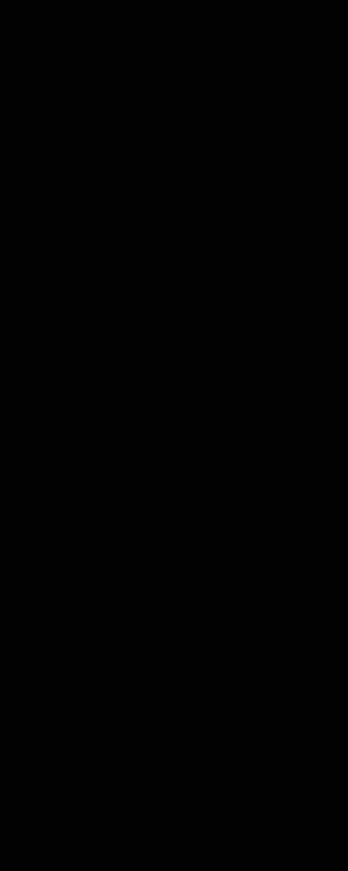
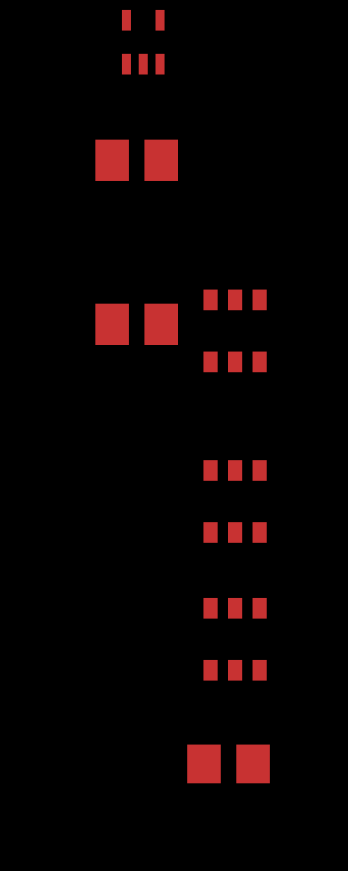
part: none -> (143, 42)
part: none -> (136, 160)
part: none -> (136, 324)
part: none -> (235, 330)
part: none -> (235, 501)
part: none -> (235, 639)
part: none -> (228, 763)

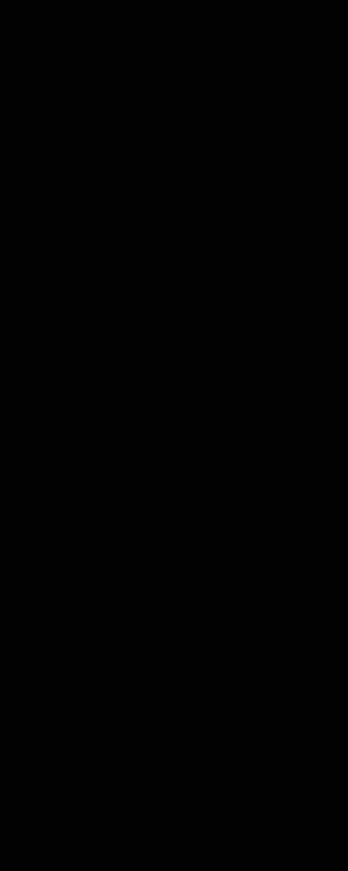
part: (143, 42) -> none
part: (136, 160) -> none
part: (136, 324) -> none
part: (235, 330) -> none
part: (235, 501) -> none
part: (235, 639) -> none
part: (228, 763) -> none

